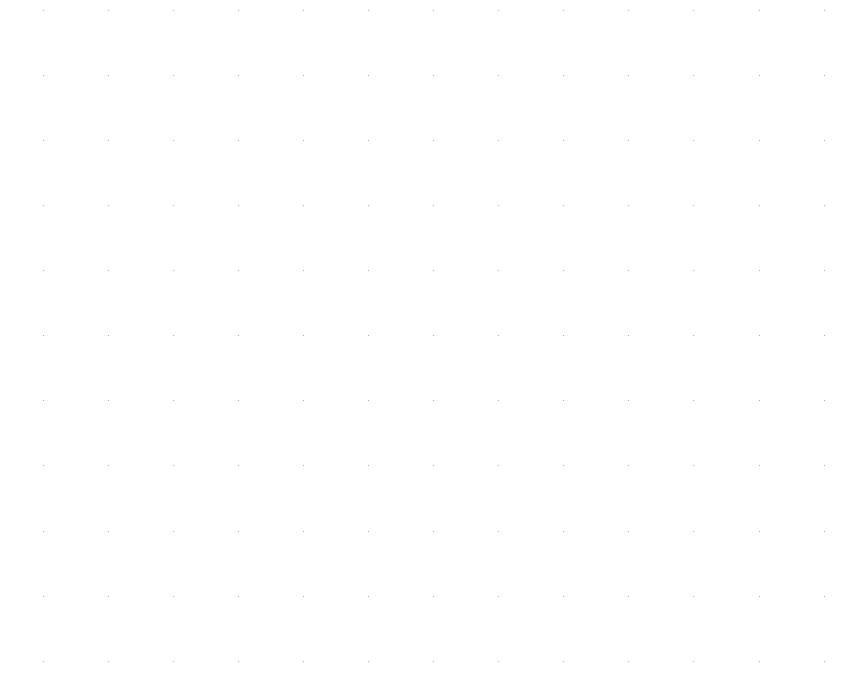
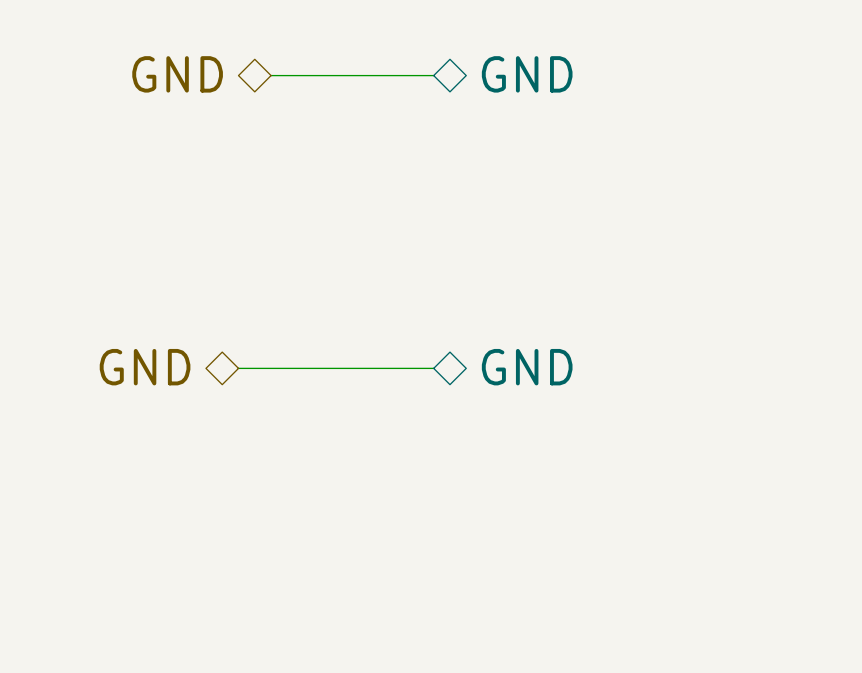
hierarchical label: none -> GND (177, 74)
sheet pin: none -> GND (527, 74)
wire: none -> (271, 75) (433, 75)
hierarchical label: none -> GND (145, 367)
sheet pin: none -> GND (527, 367)
wire: none -> (238, 368) (433, 368)

